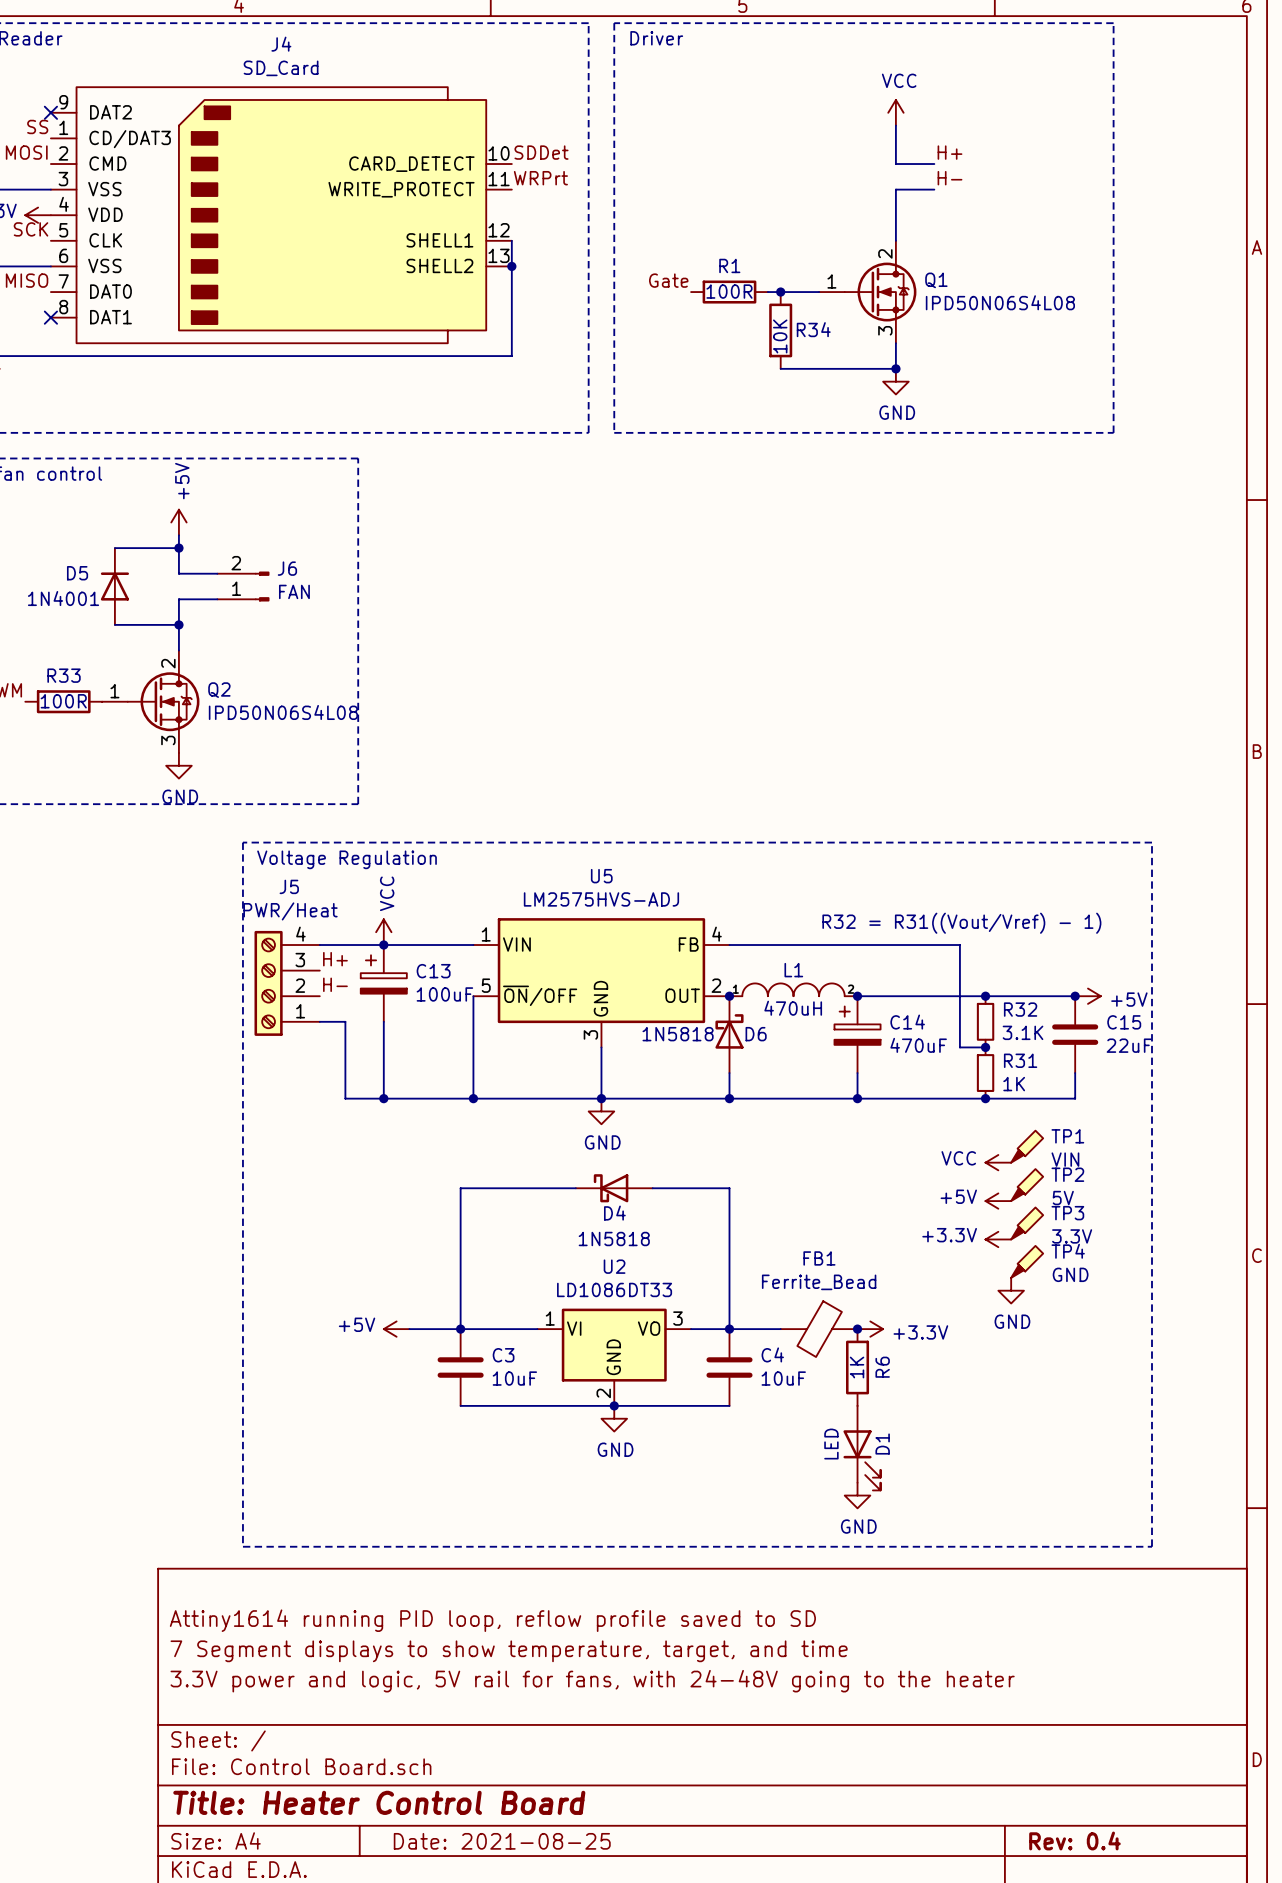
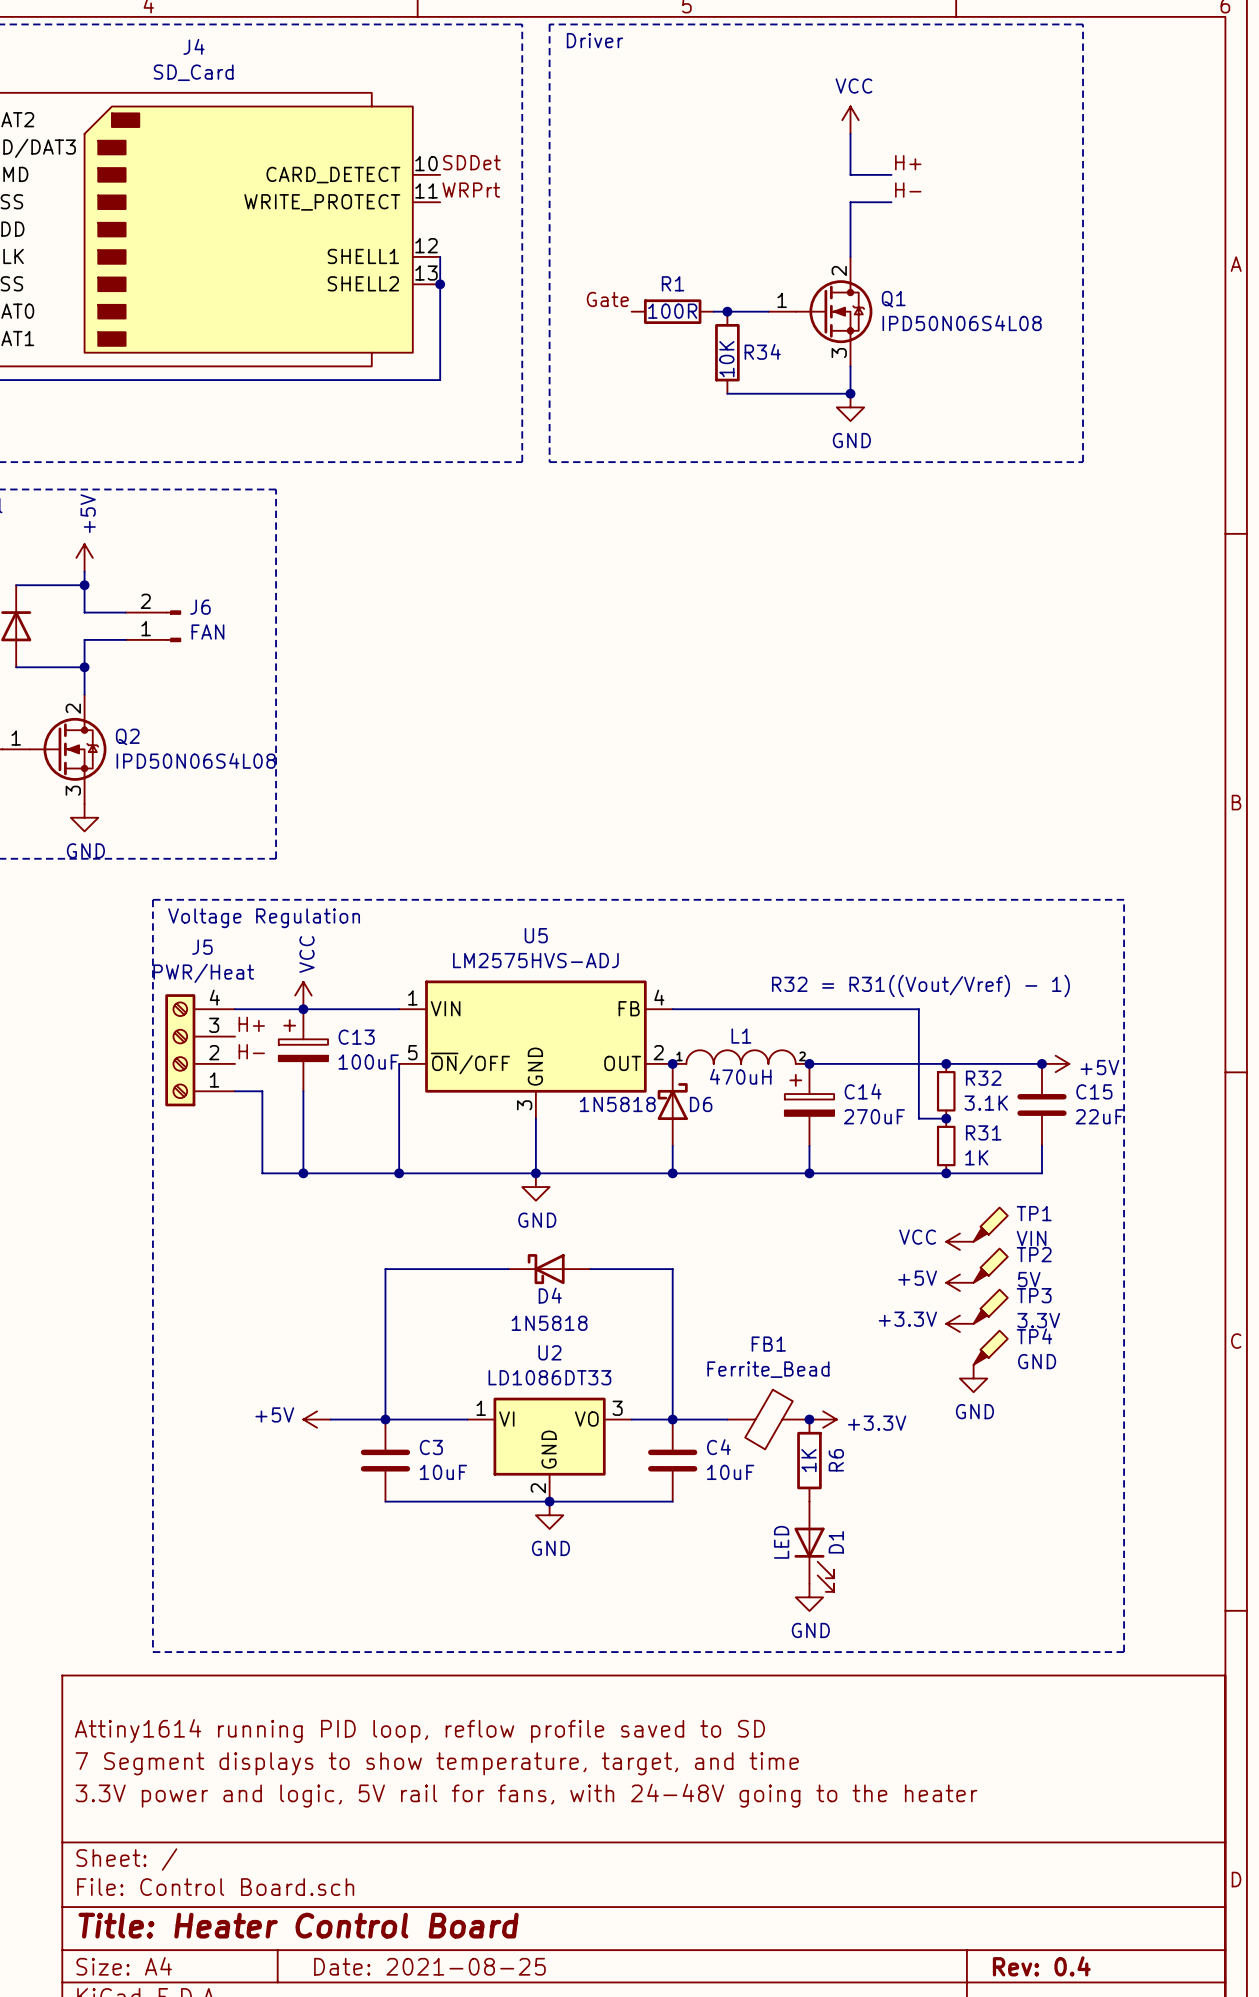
C14 value: 470uF (918, 1045) -> 270uF (874, 1116)

